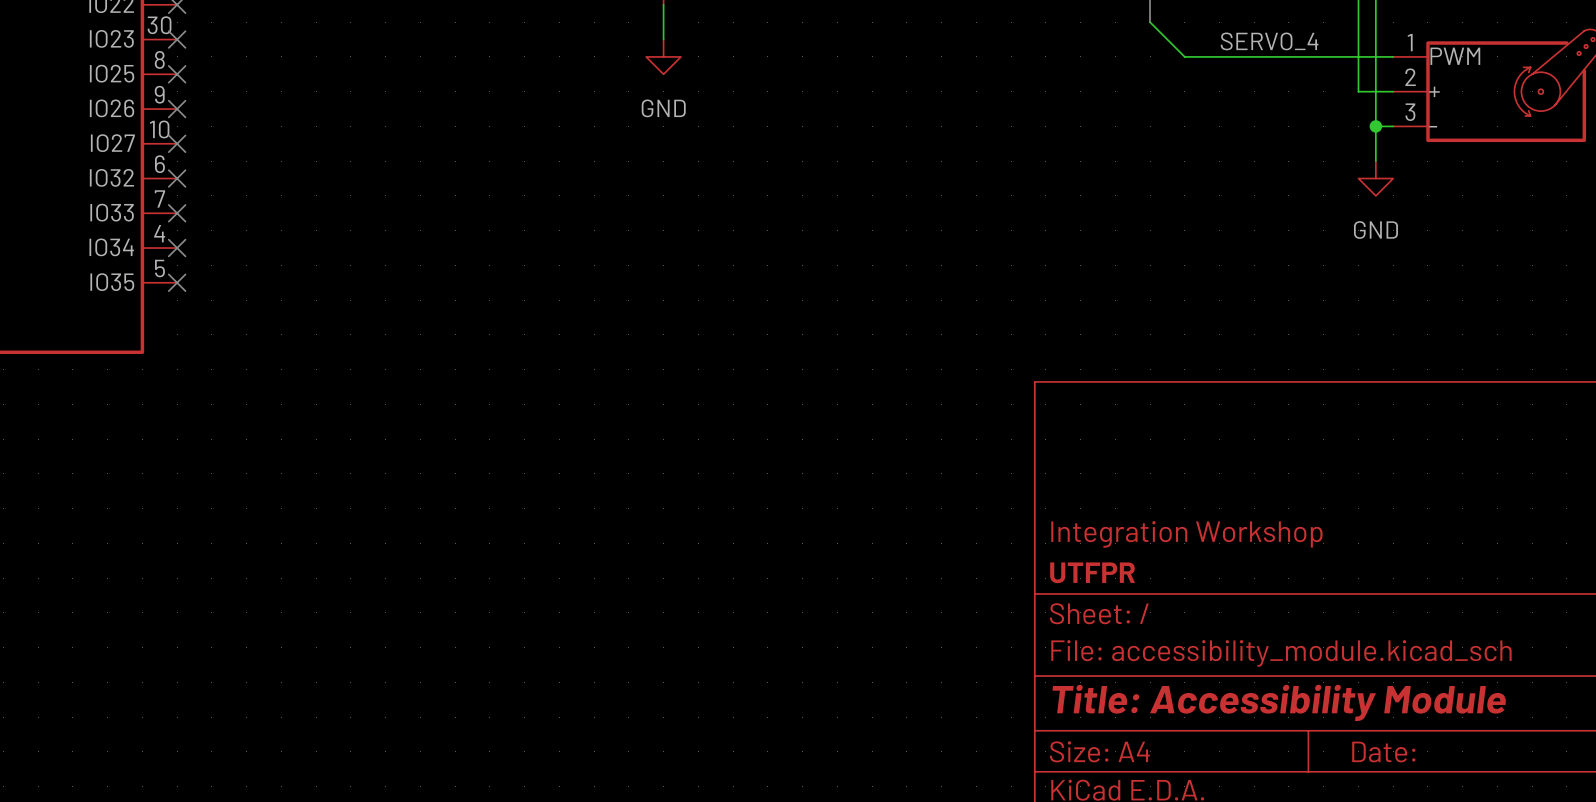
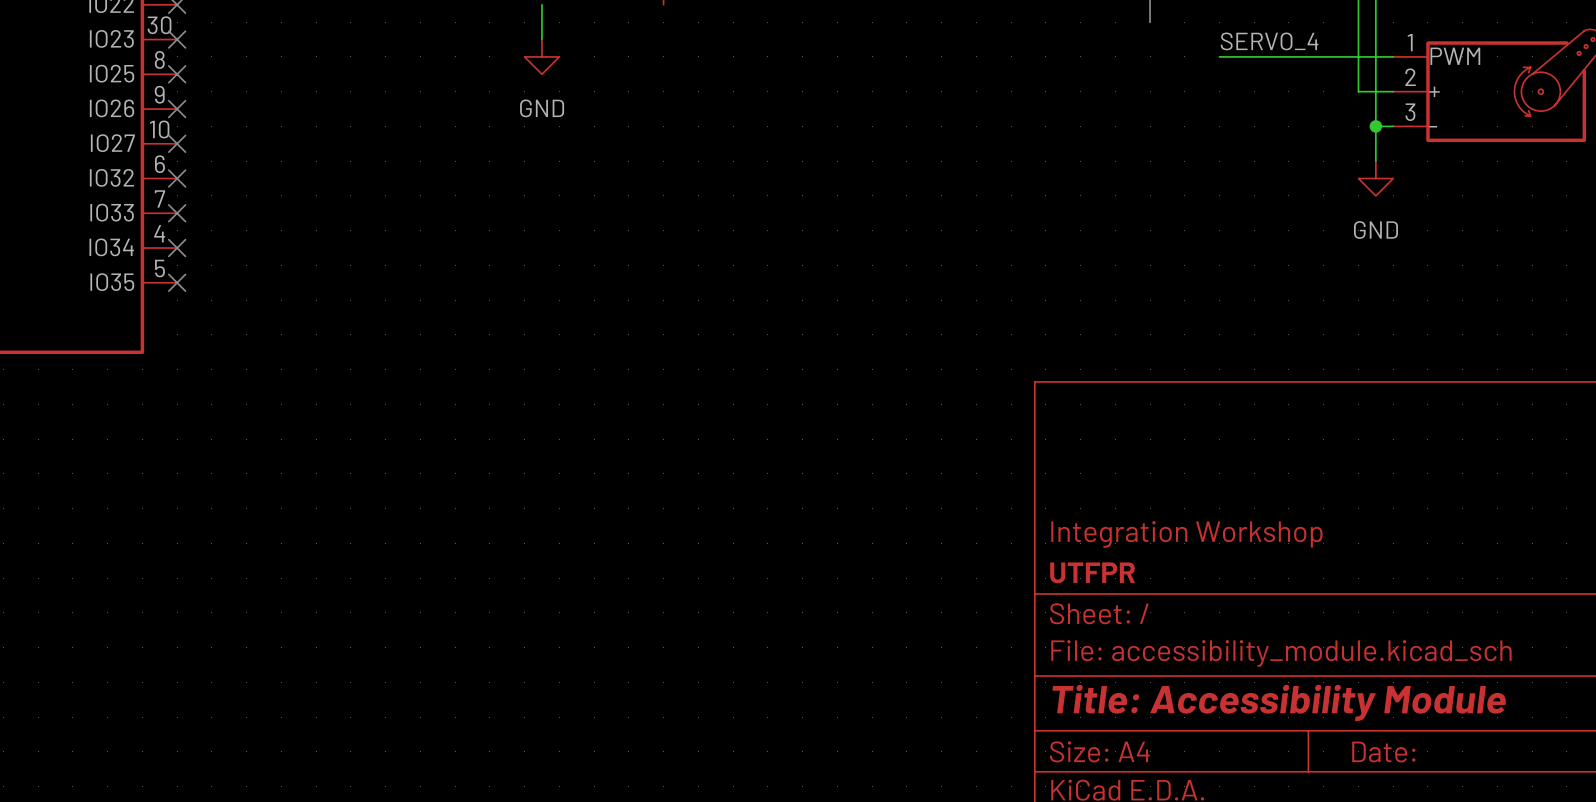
wire: (663, 4) (663, 39) -> (541, 4) (541, 39)
wire: (1150, 22) (1184, 56) (1219, 56) -> none
power symbol position: GND (663, 56) -> GND (541, 56)

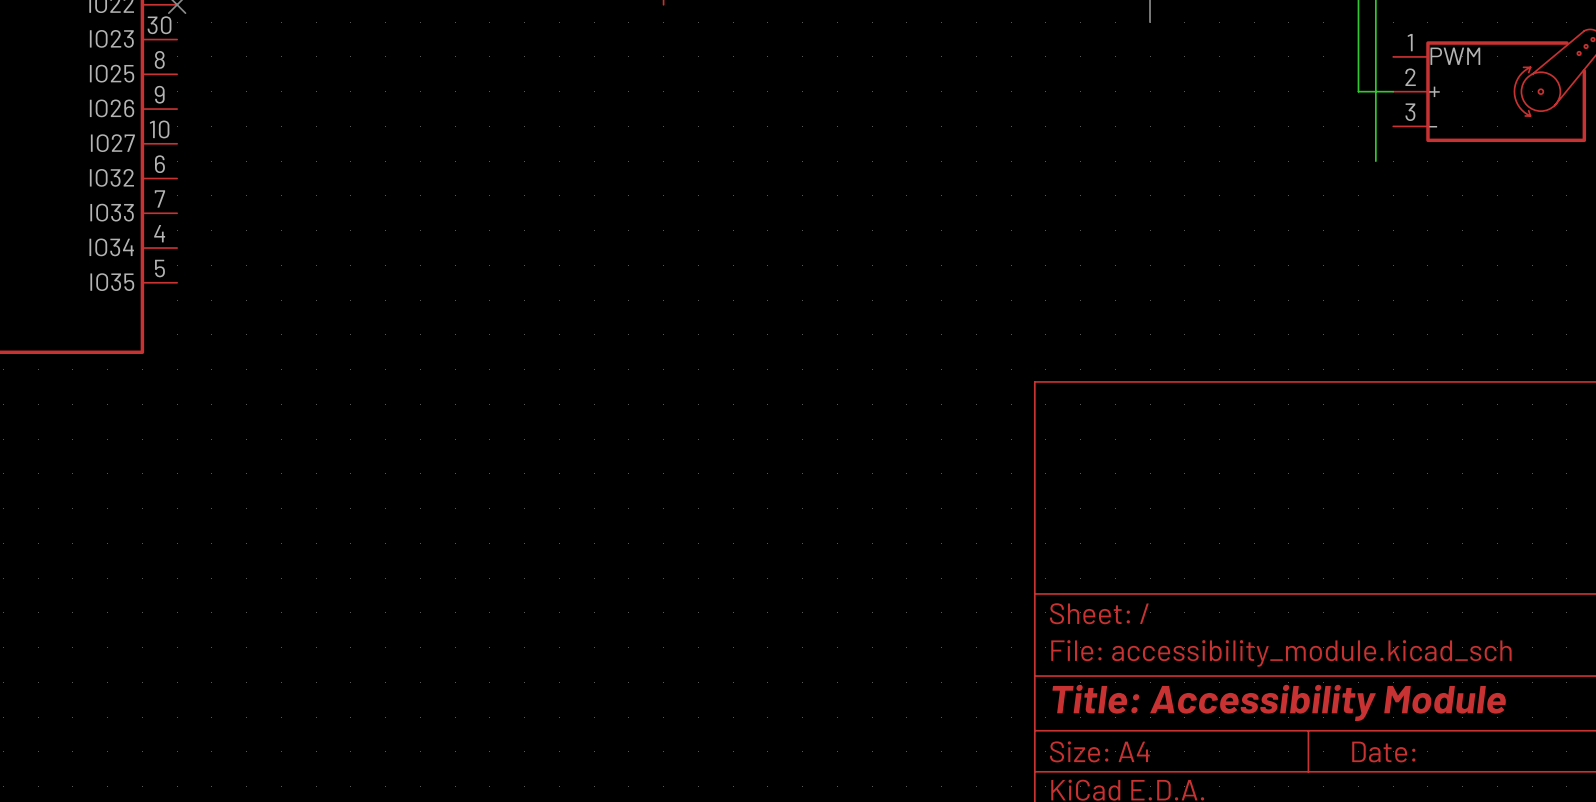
wire: (541, 4) (541, 39) -> none
no-connect mark: (177, 39) -> none
label: SERVO_4 (1269, 41) -> none
power symbol: GND (541, 56) -> none
wire: (1219, 56) (1393, 56) -> none
no-connect mark: (177, 74) -> none
no-connect mark: (177, 109) -> none
wire: (1375, 126) (1393, 126) -> none
junction: (1375, 126) -> none
no-connect mark: (177, 143) -> none
no-connect mark: (177, 178) -> none
power symbol: GND (1375, 178) -> none
no-connect mark: (177, 213) -> none
no-connect mark: (177, 248) -> none
no-connect mark: (177, 282) -> none
title block: Integration Workshop (1186, 534) -> none
title block: UTFPR (1092, 572) -> none

